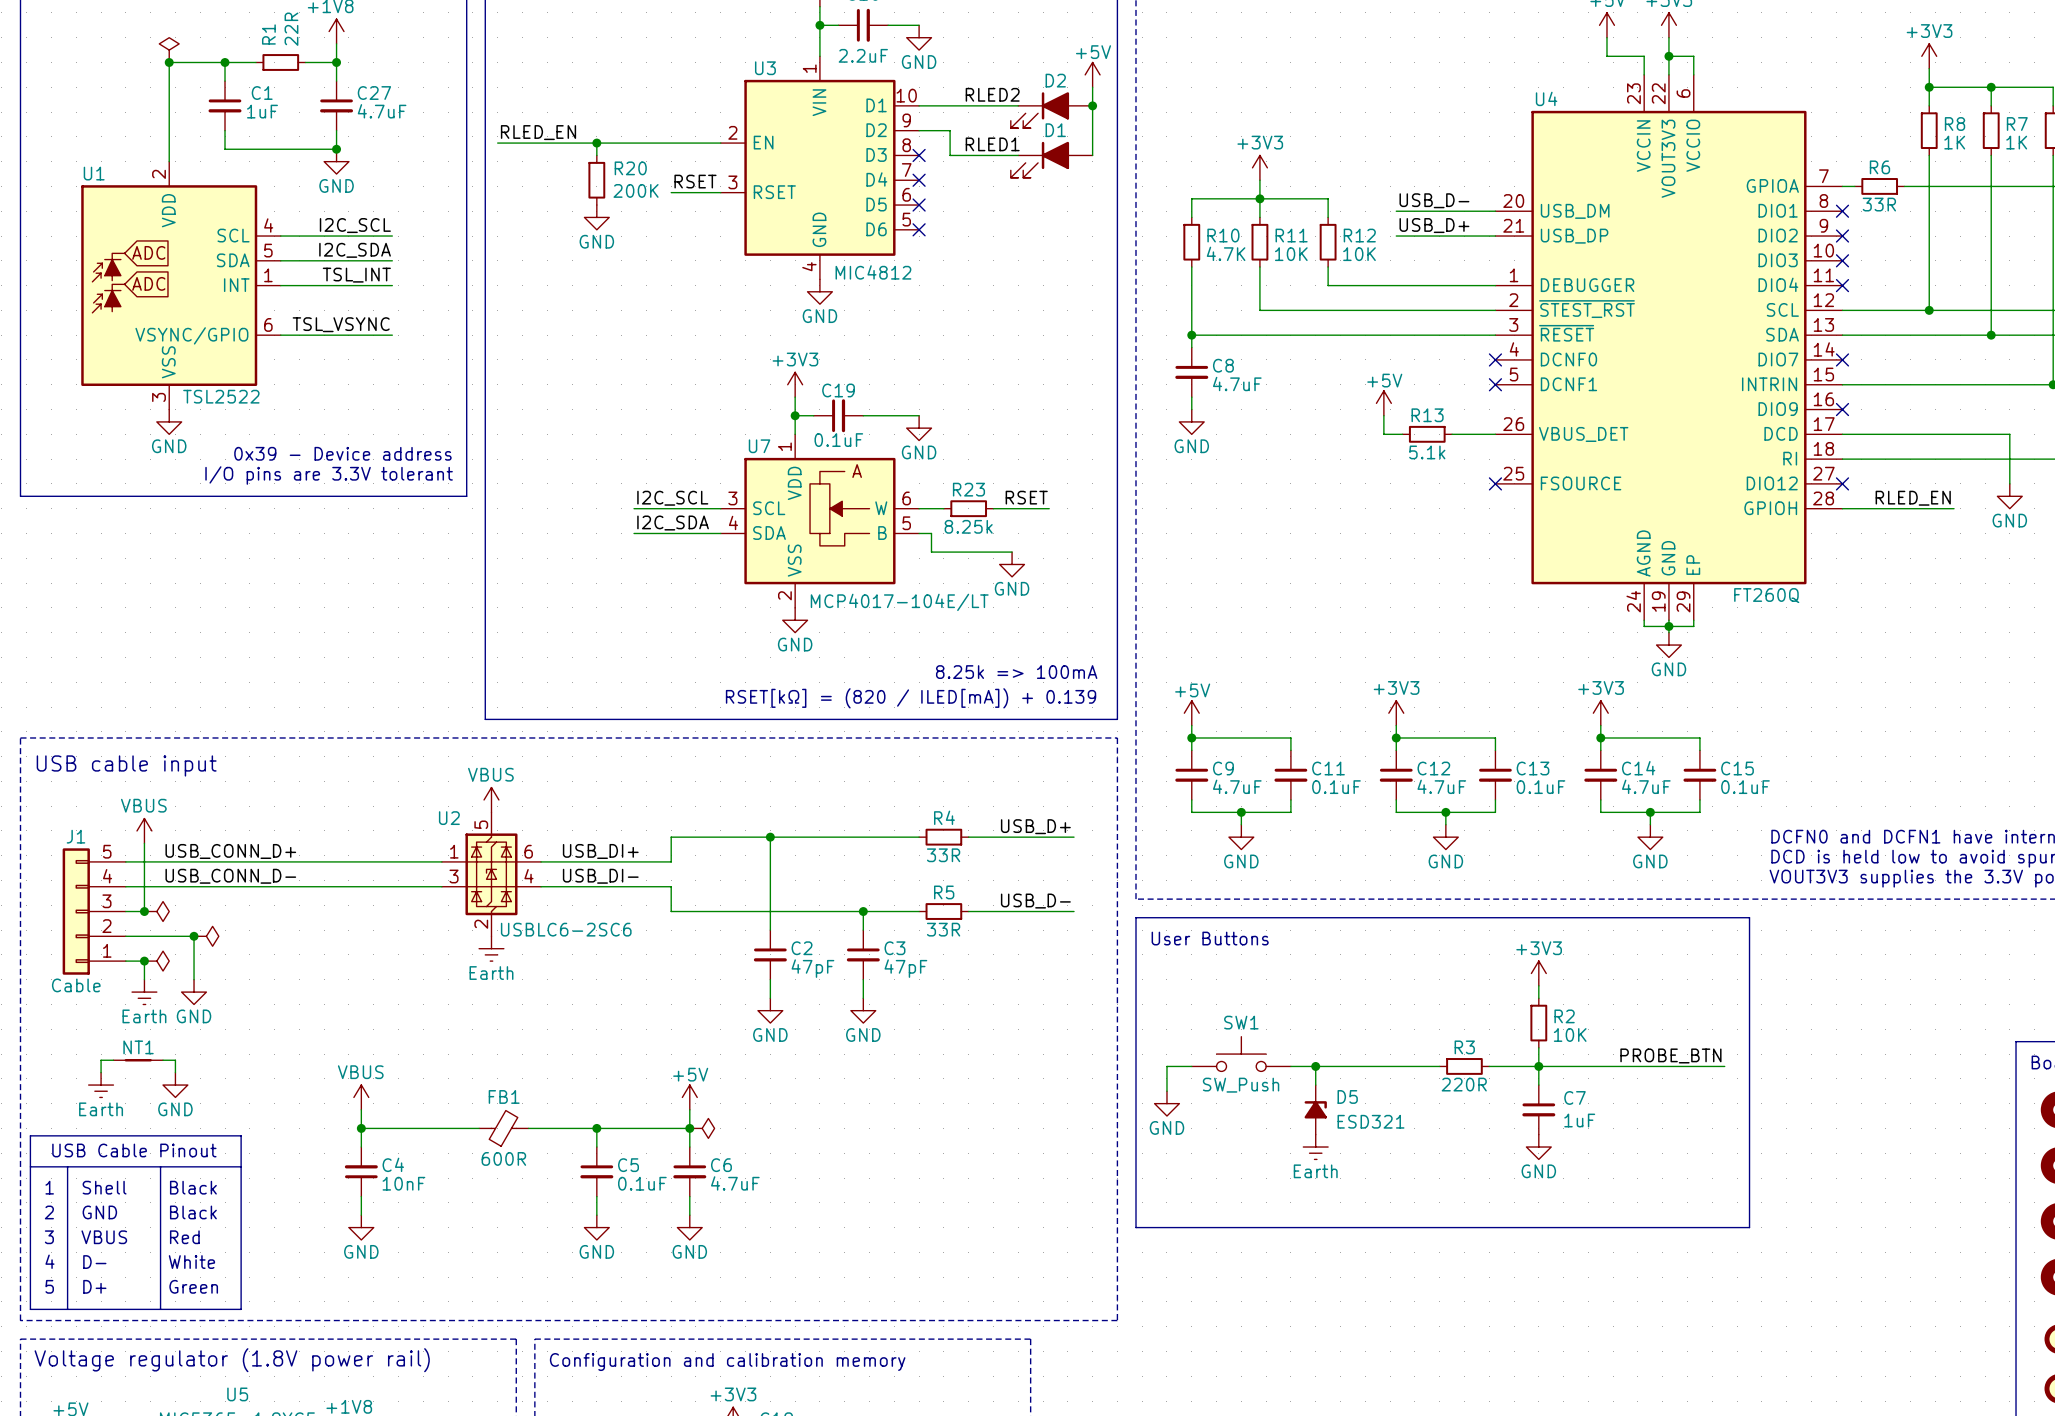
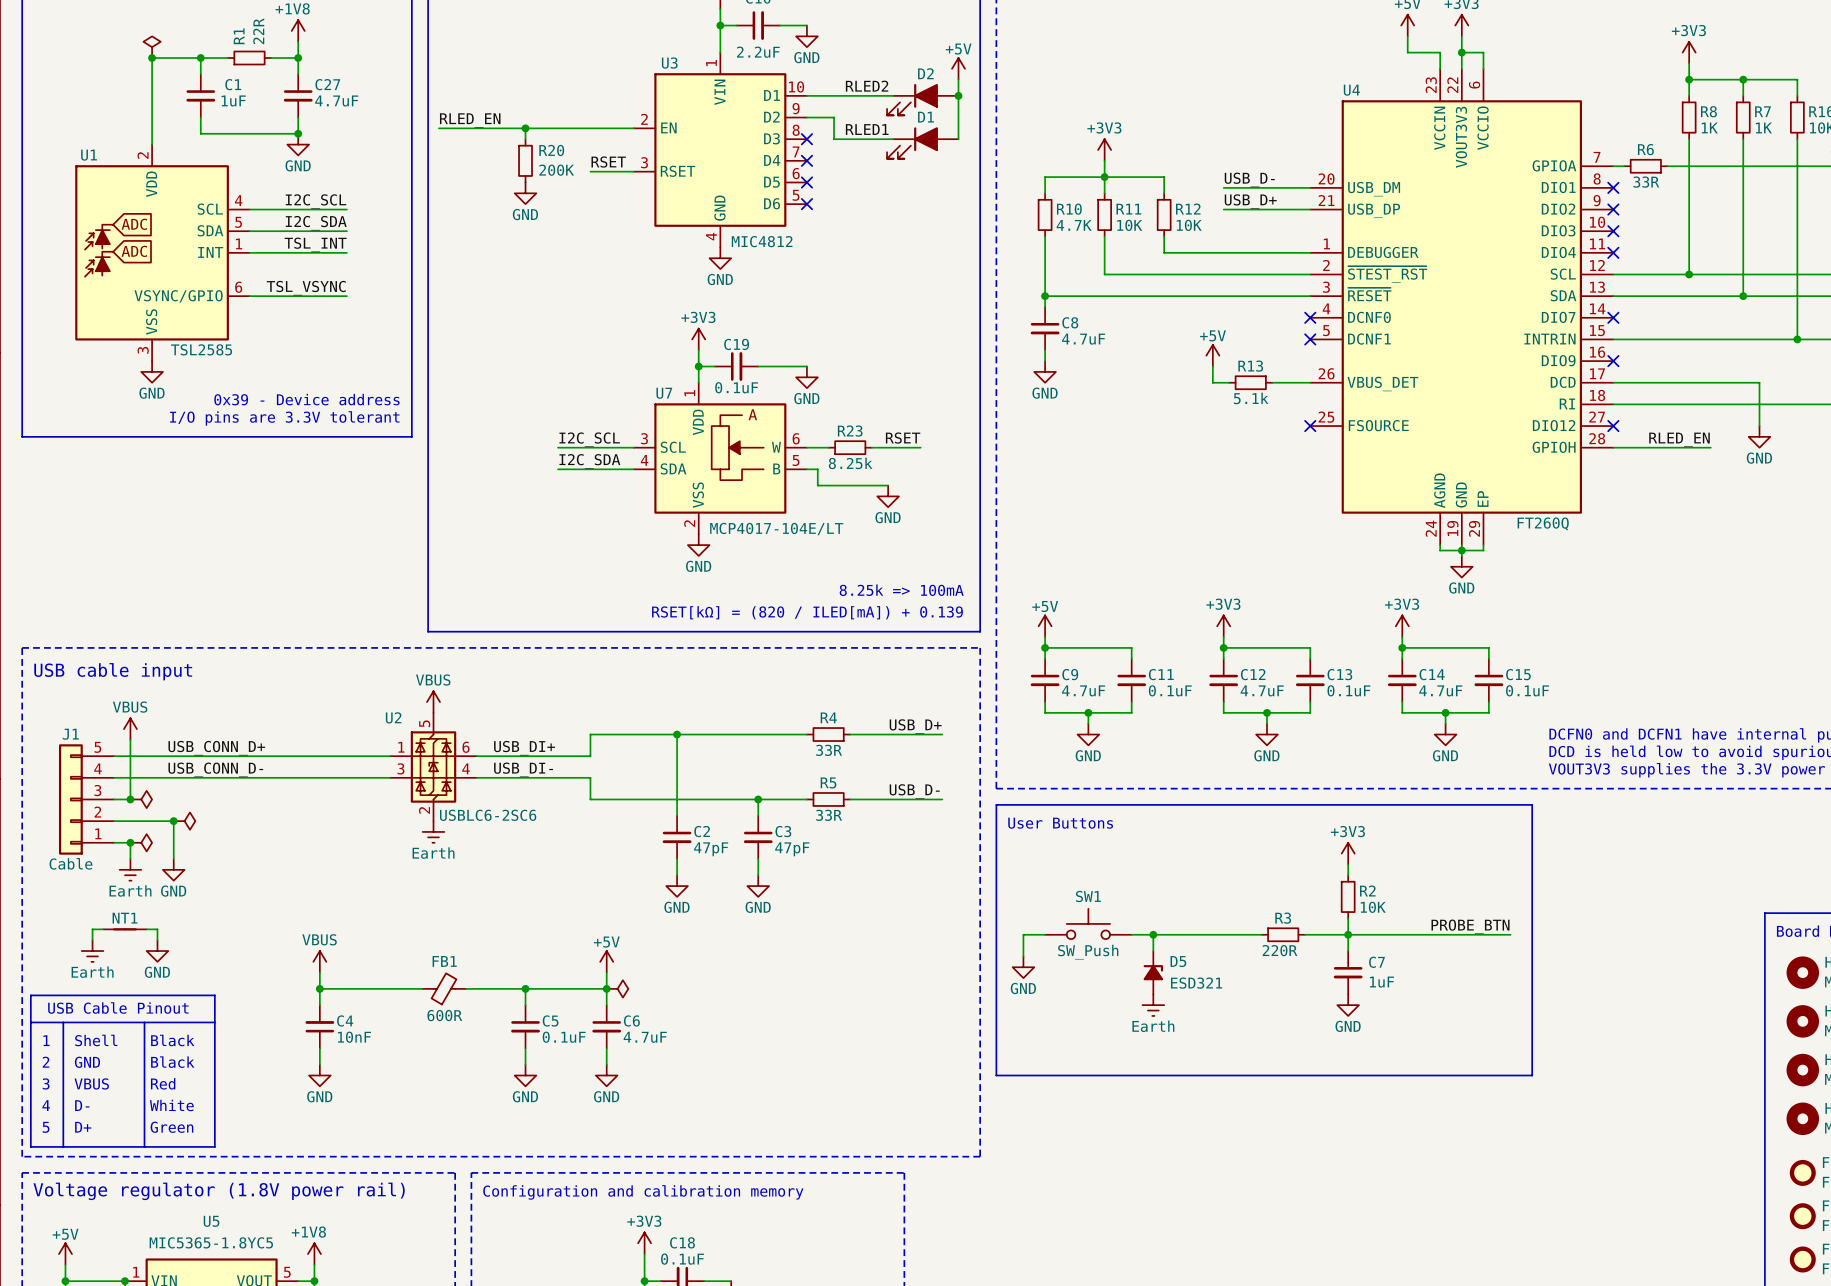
U1 value: TSL2522 (221, 396) -> TSL2585 (201, 349)

